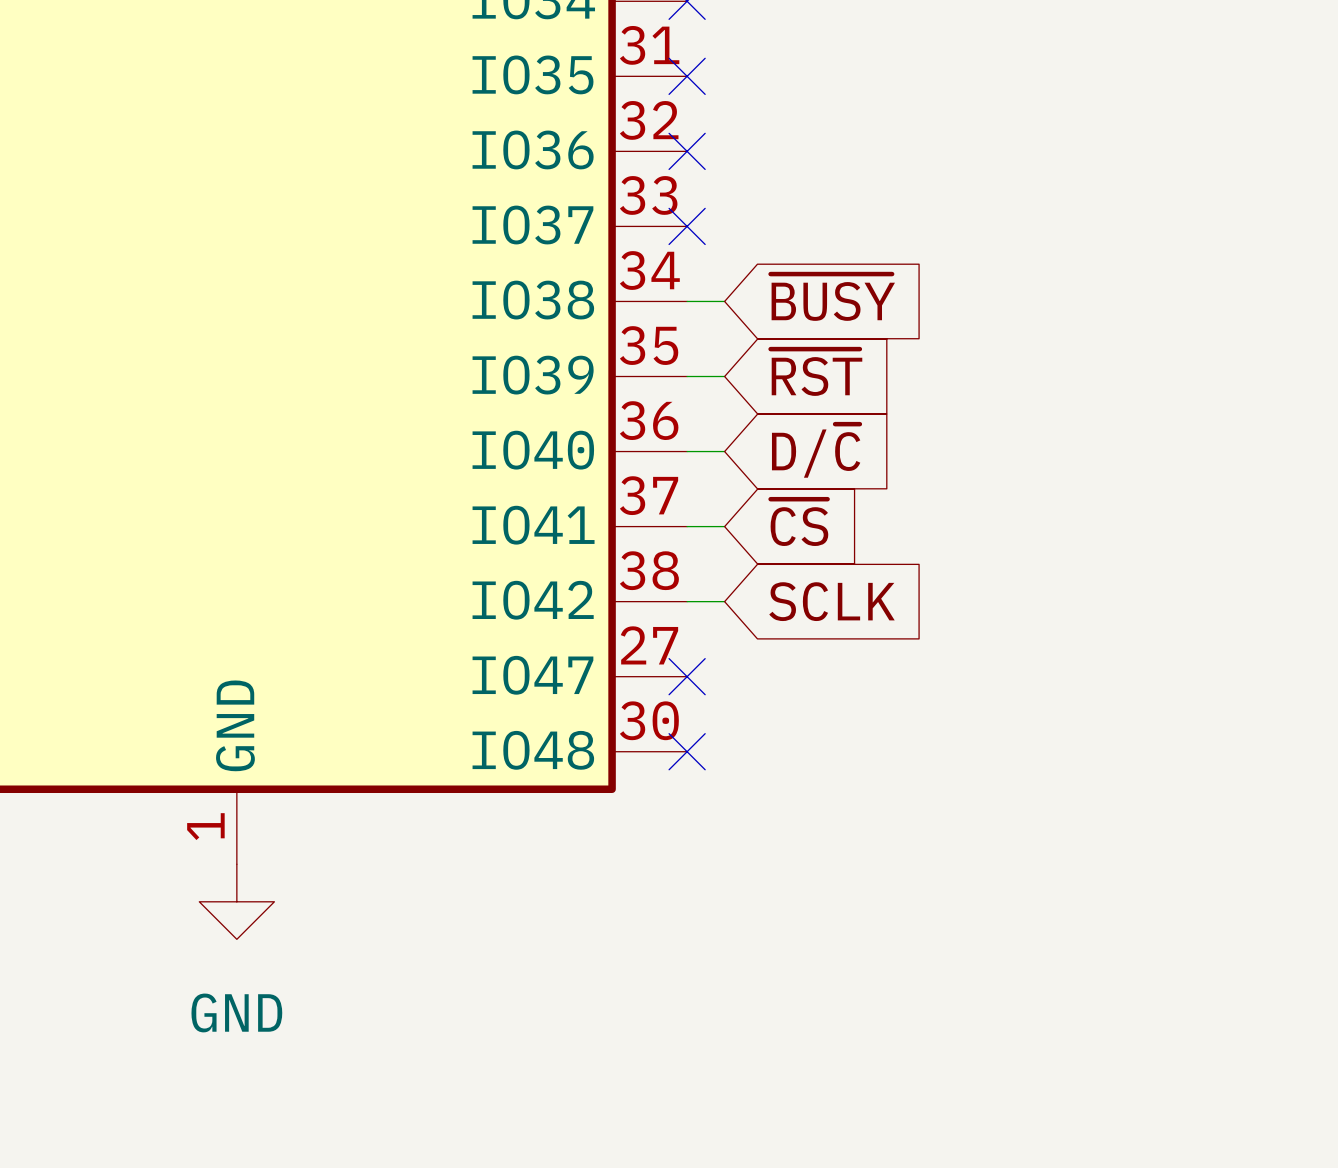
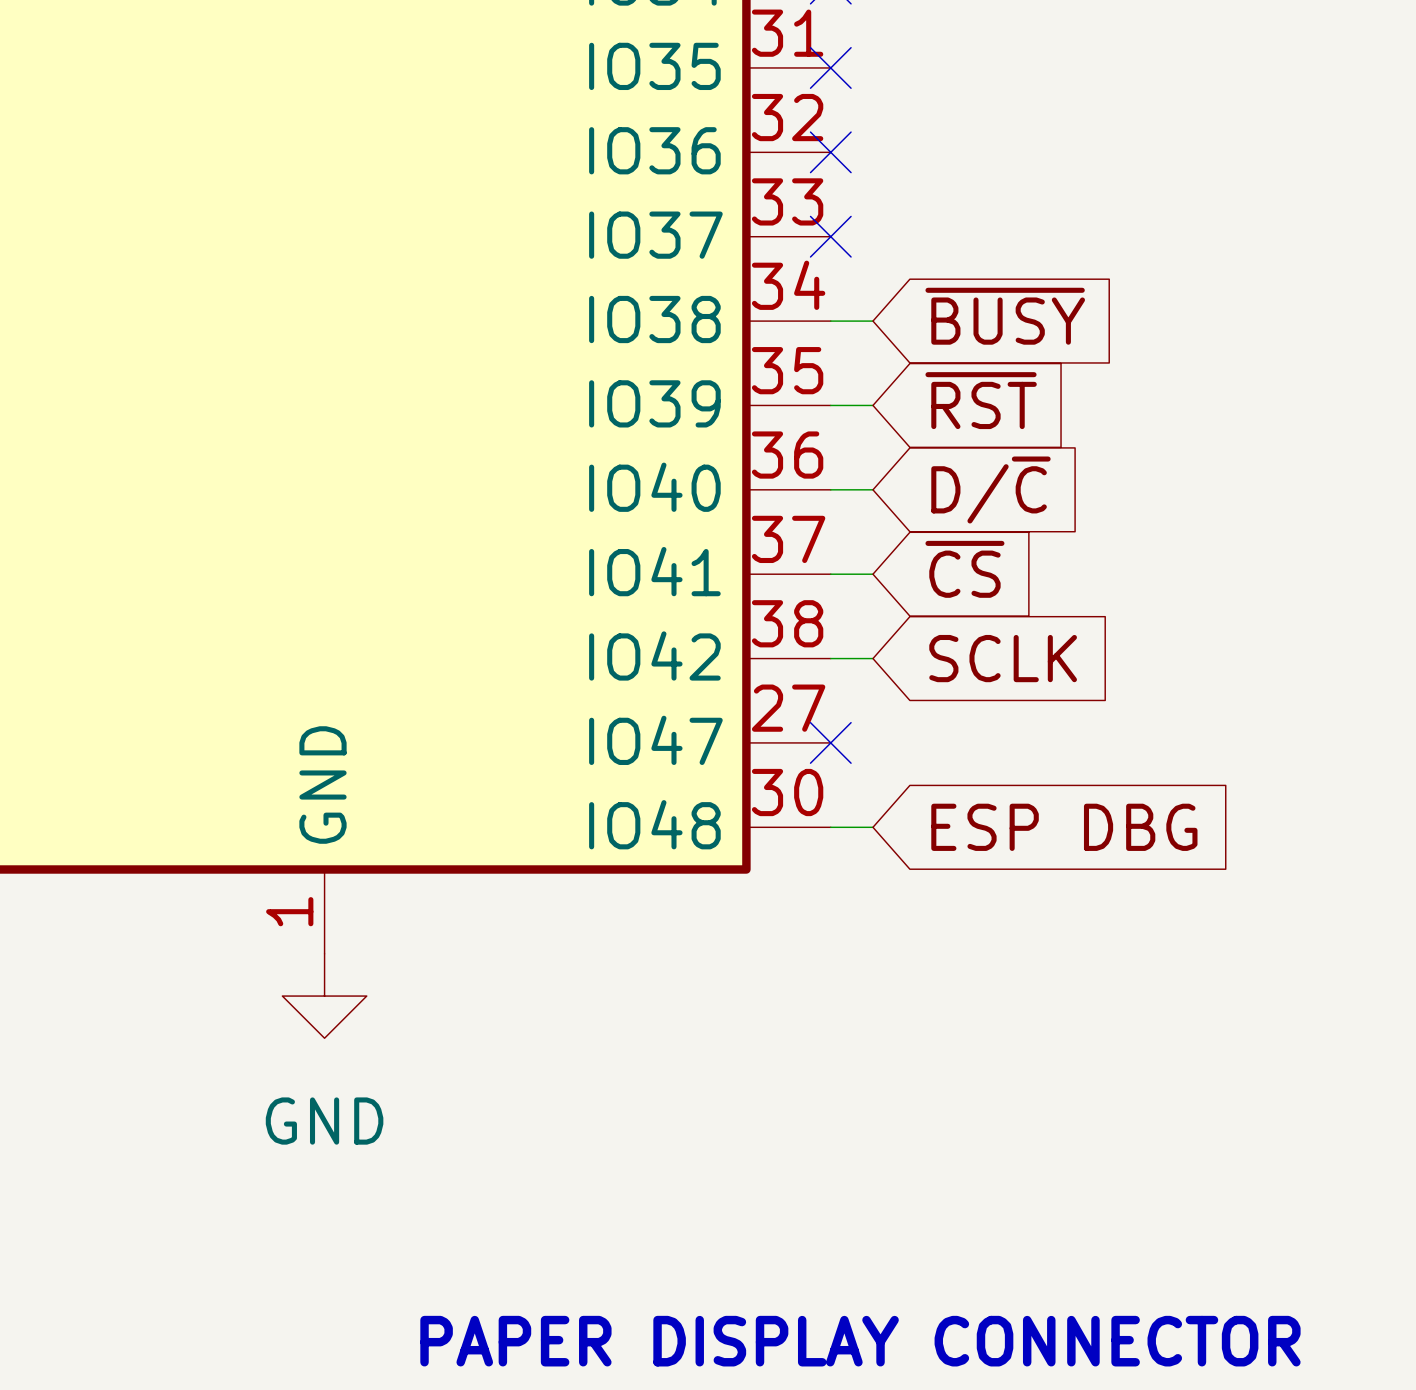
wire: none -> (830, 827) (872, 827)
no-connect mark: (687, 751) -> none
global label: none -> ESP DBG (1064, 827)

